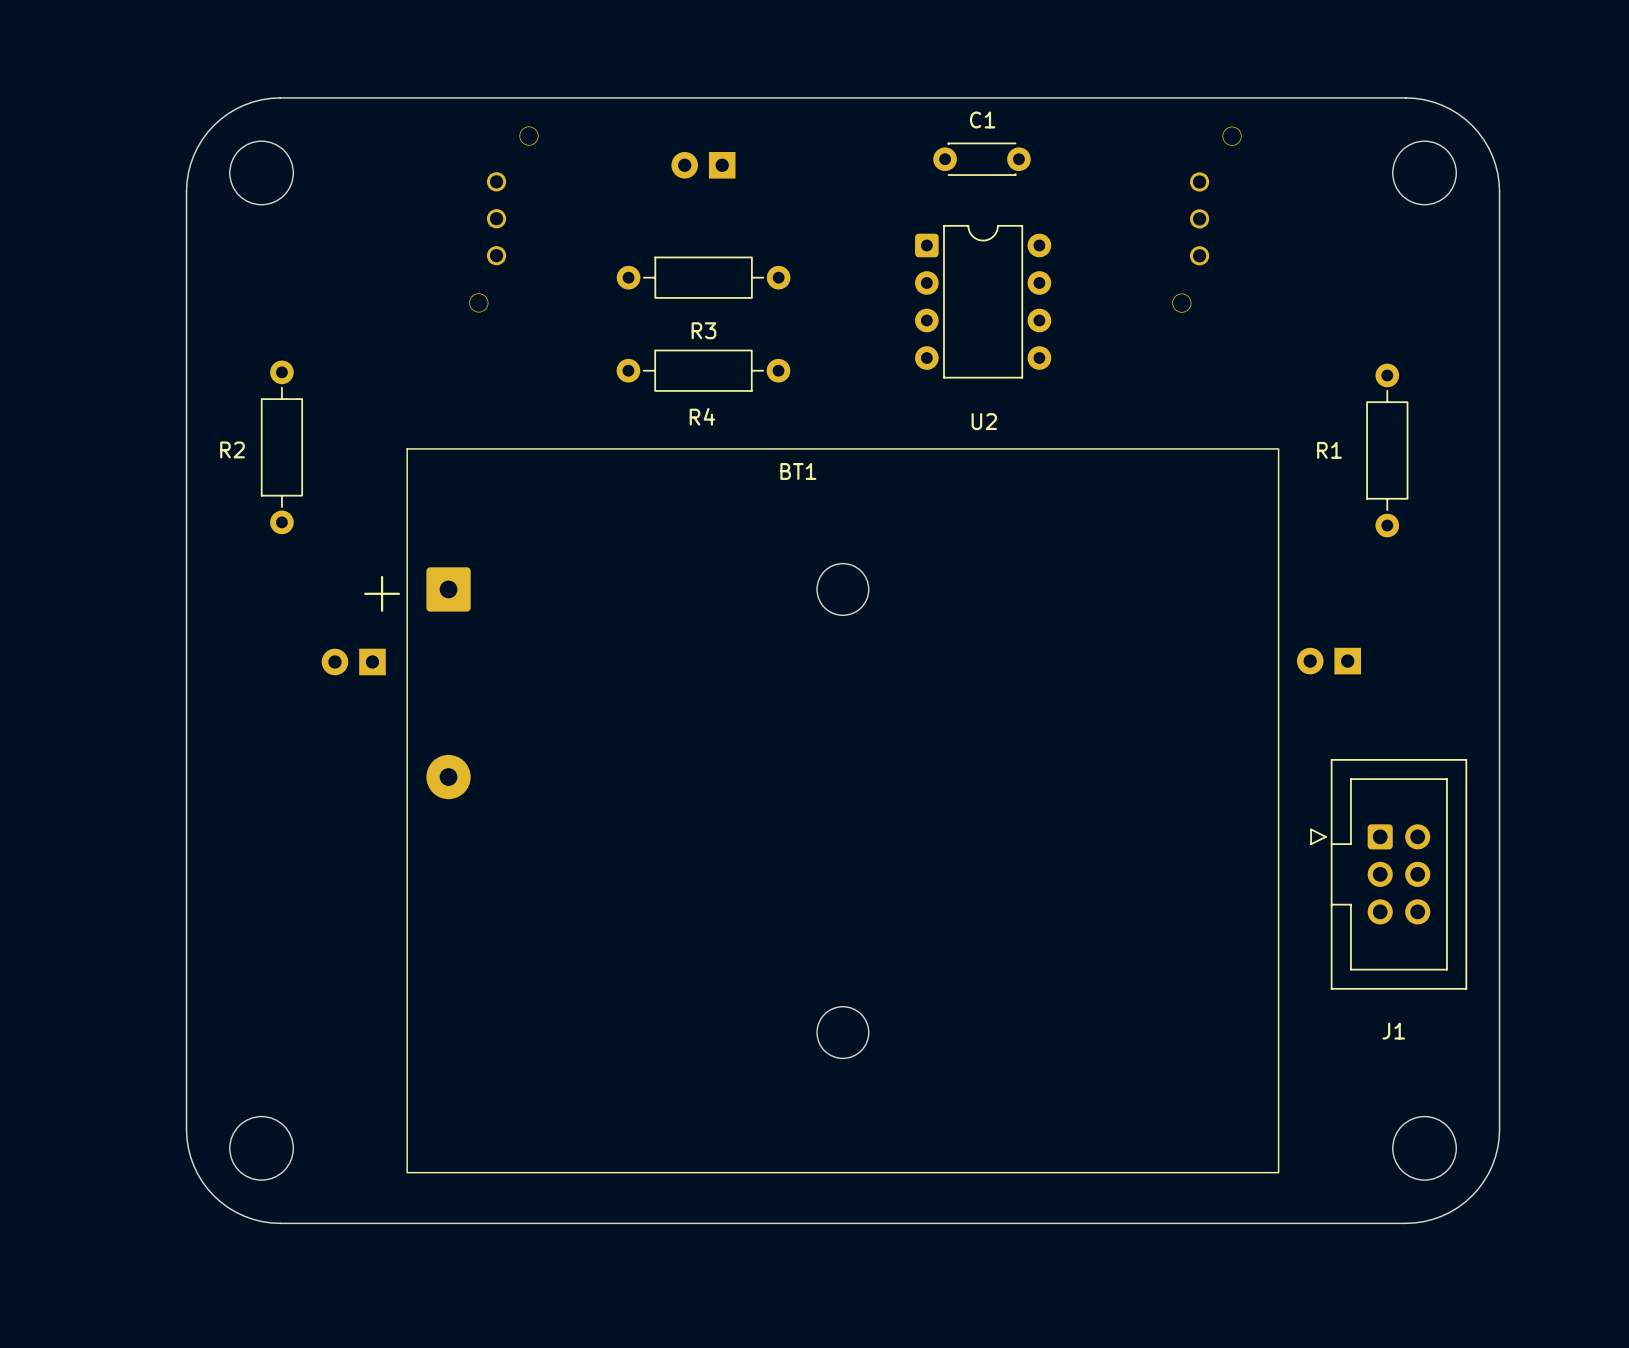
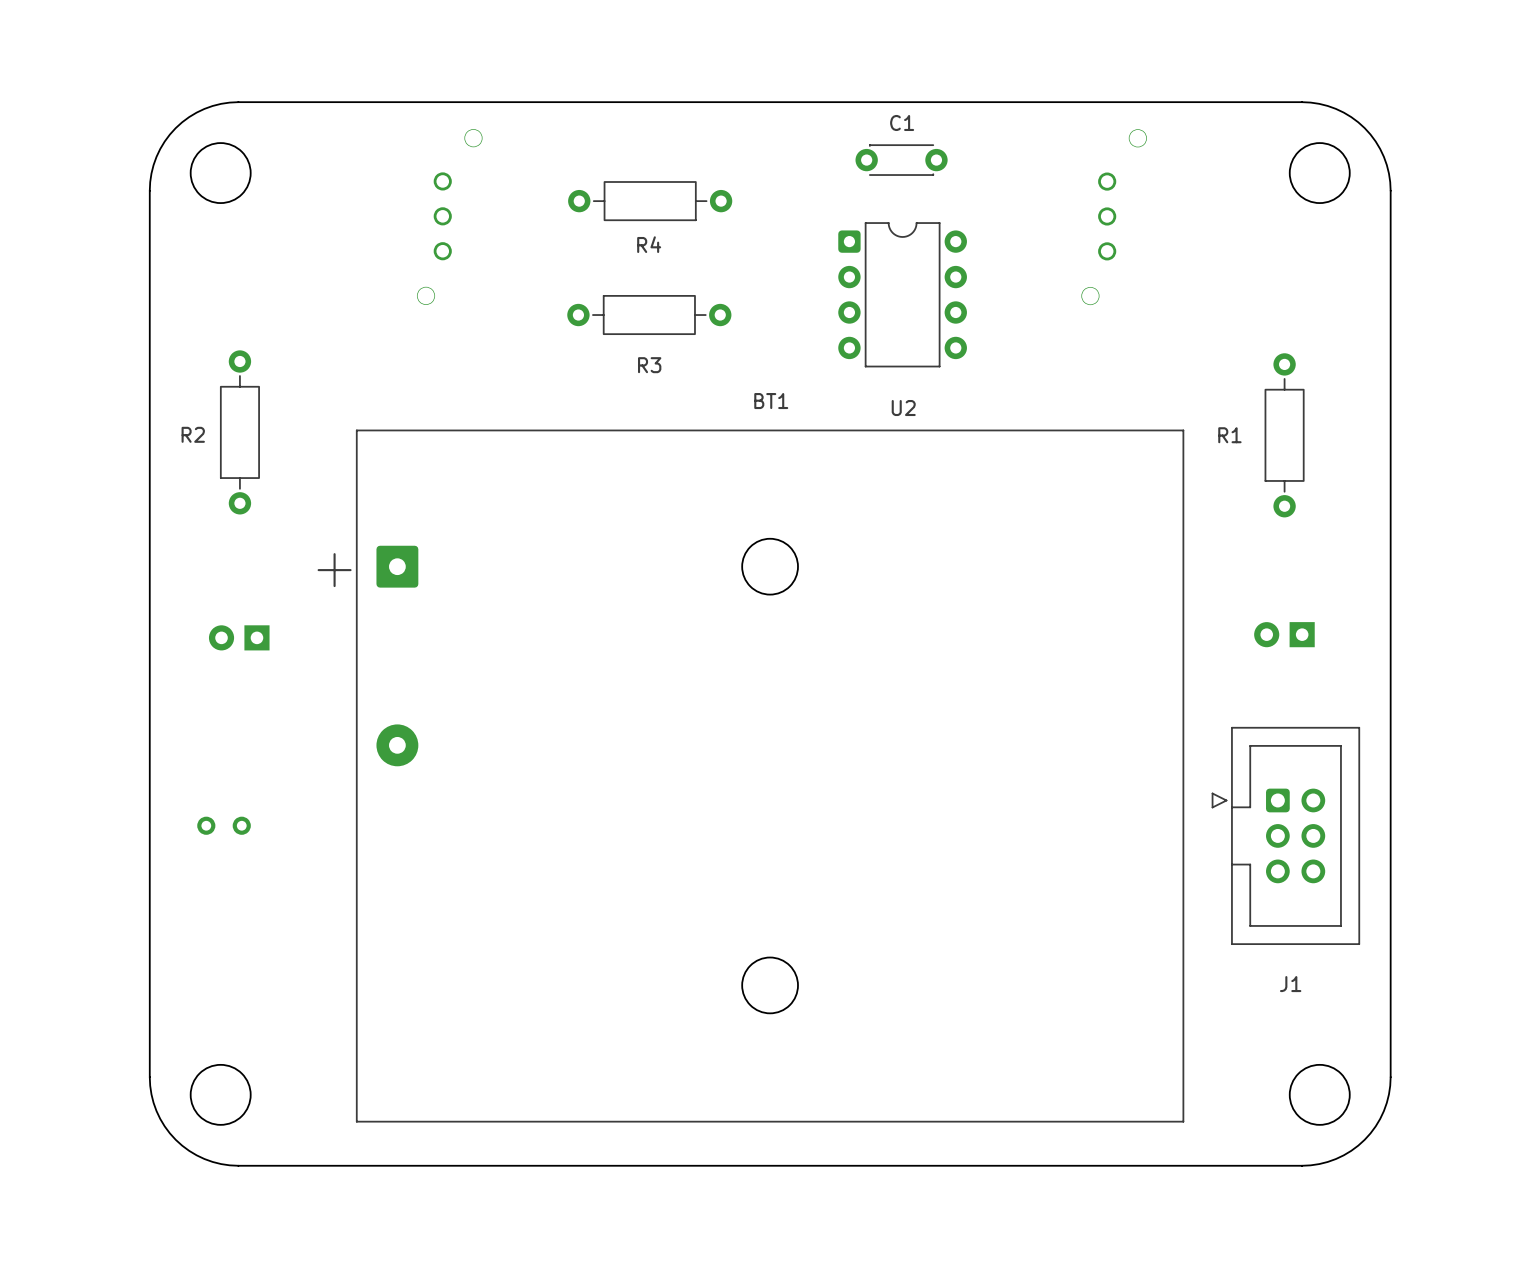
part: (703, 165) -> none
R3 position: (703, 277) -> (649, 315)
R4 position: (703, 370) -> (650, 201)
BT1 footprint: [406, 448, 1280, 1174] -> [355, 429, 1185, 1123]
BT1 name position: BT1 (798, 471) -> BT1 (771, 401)
part position: (353, 661) -> (239, 637)
part position: (1328, 661) -> (1284, 634)
part: none -> (224, 825)

